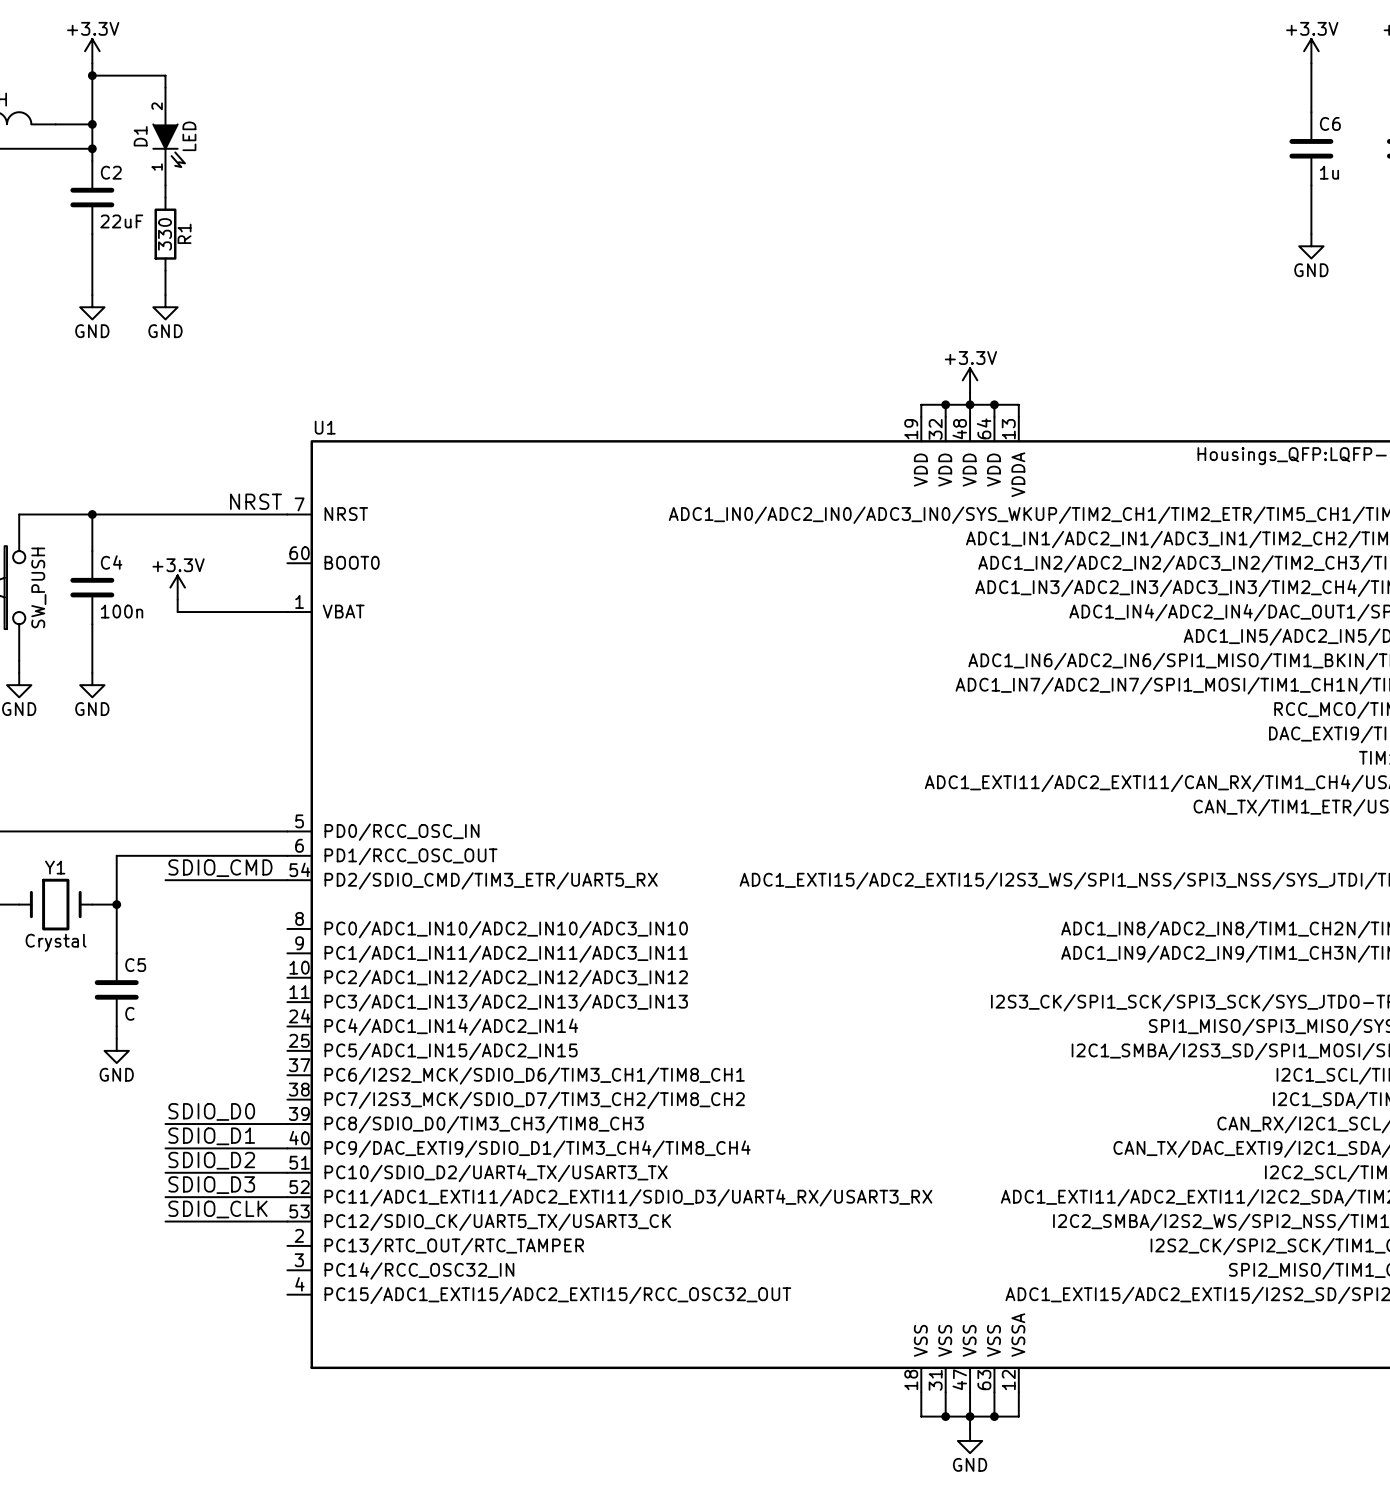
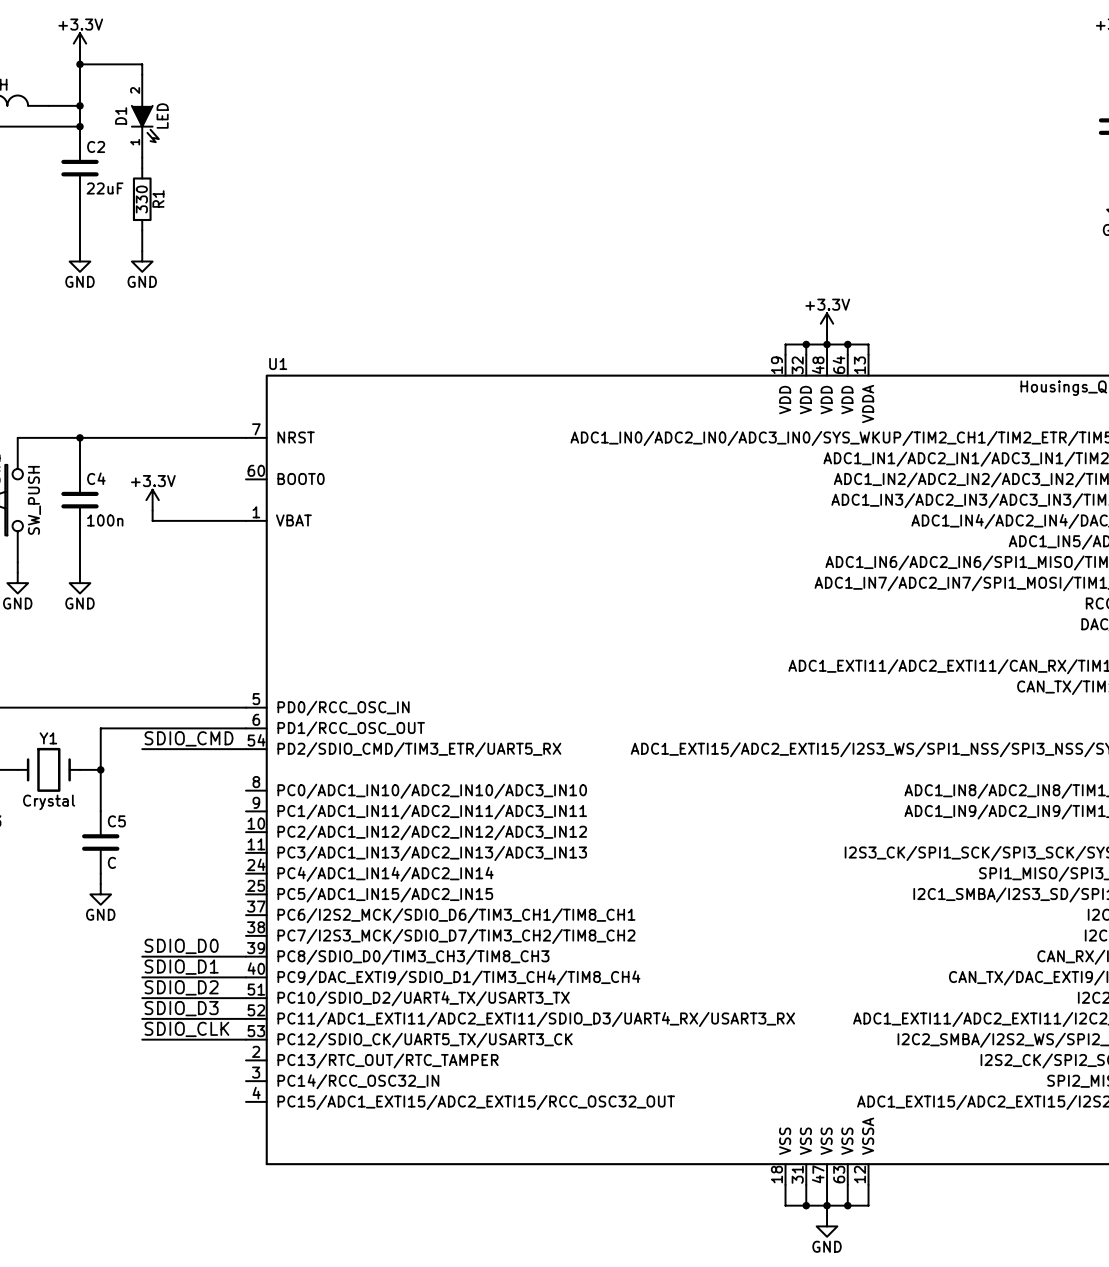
label: NRST (255, 501) -> none

